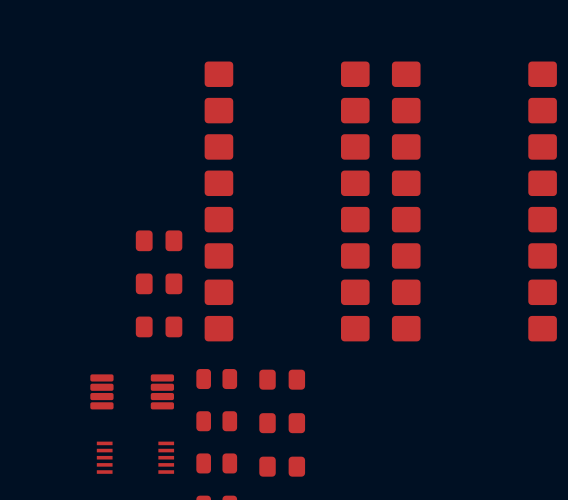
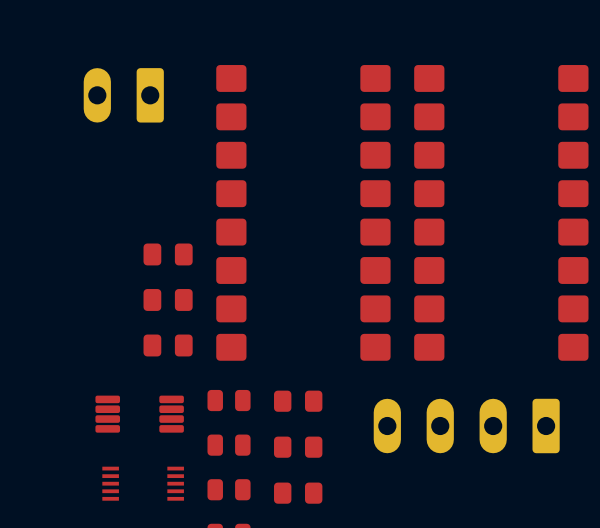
part: none -> (123, 95)
part: none -> (466, 426)

